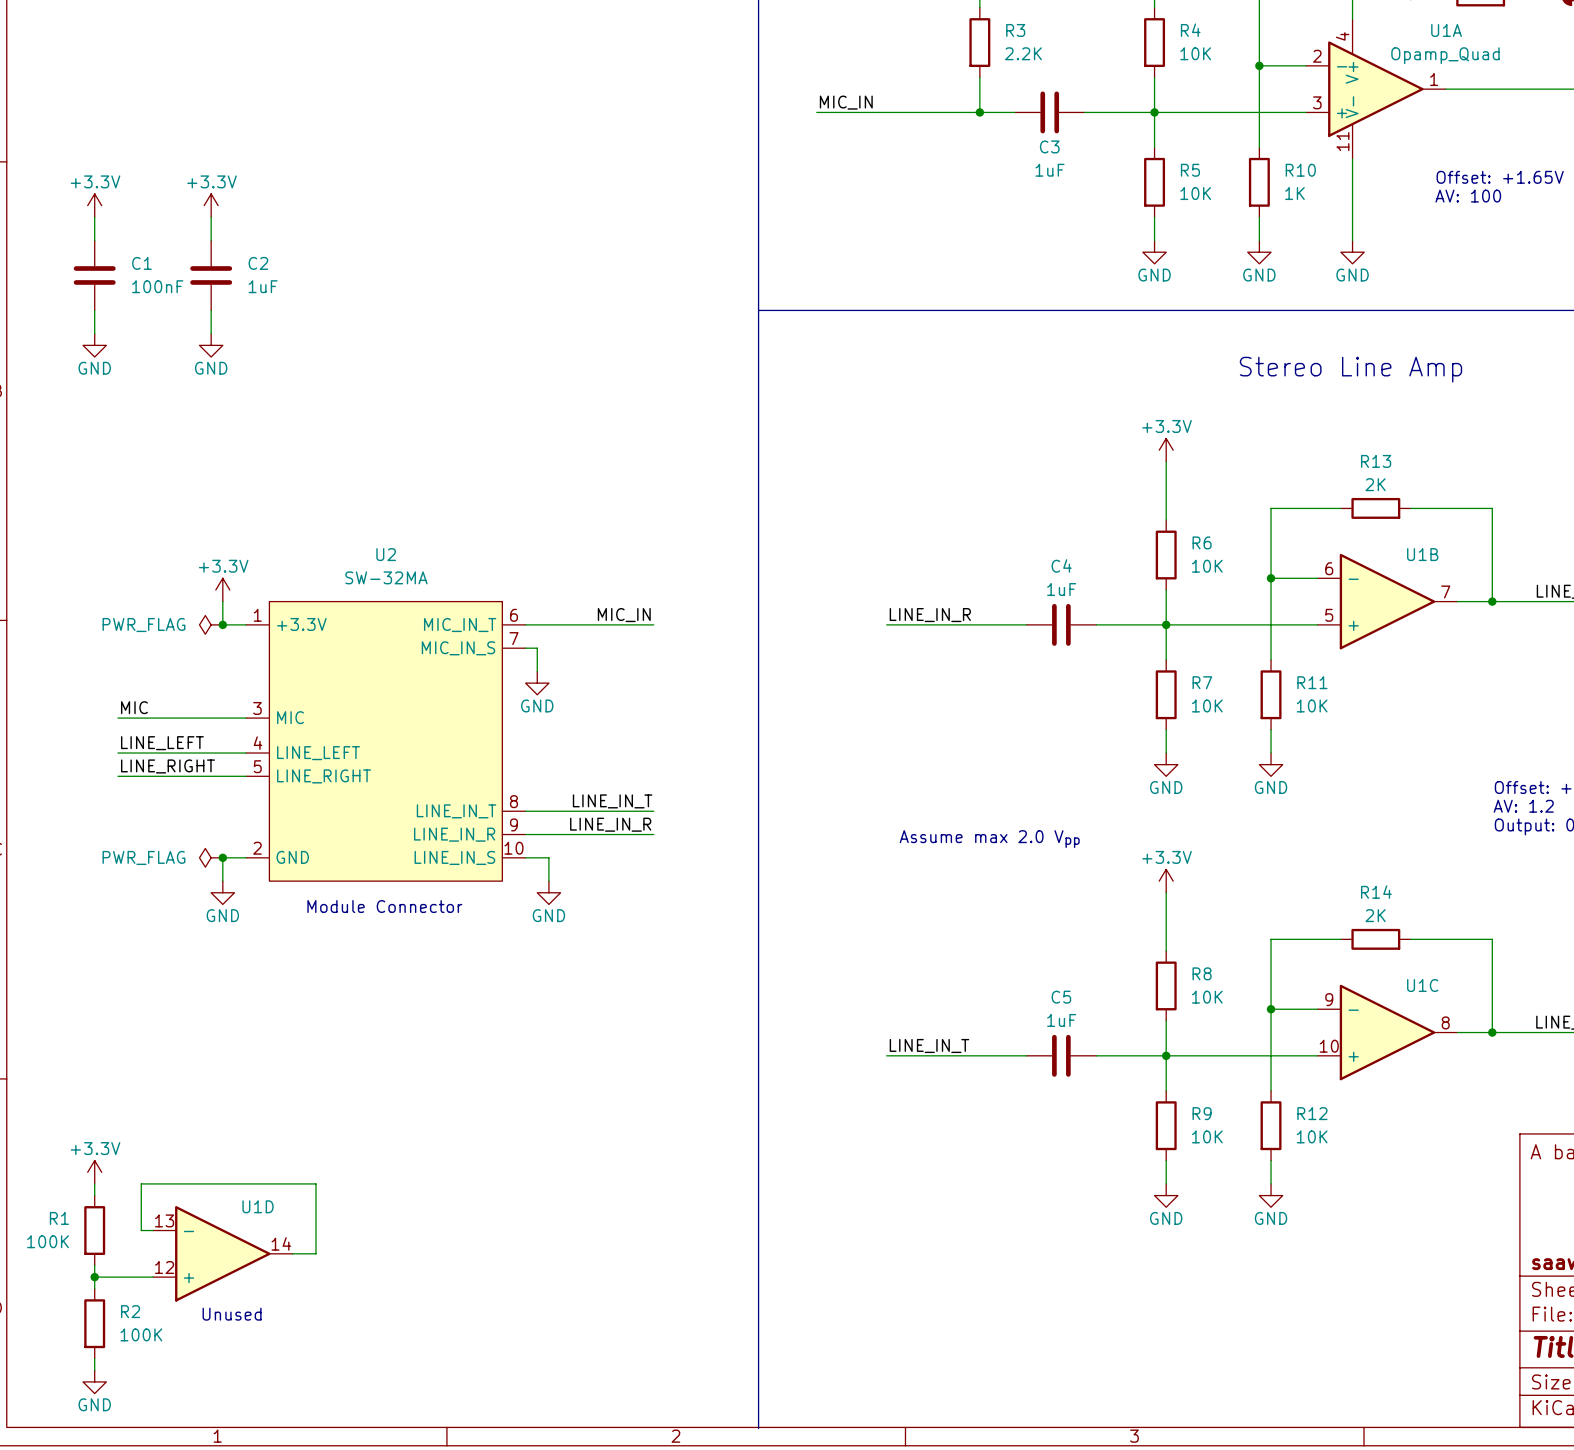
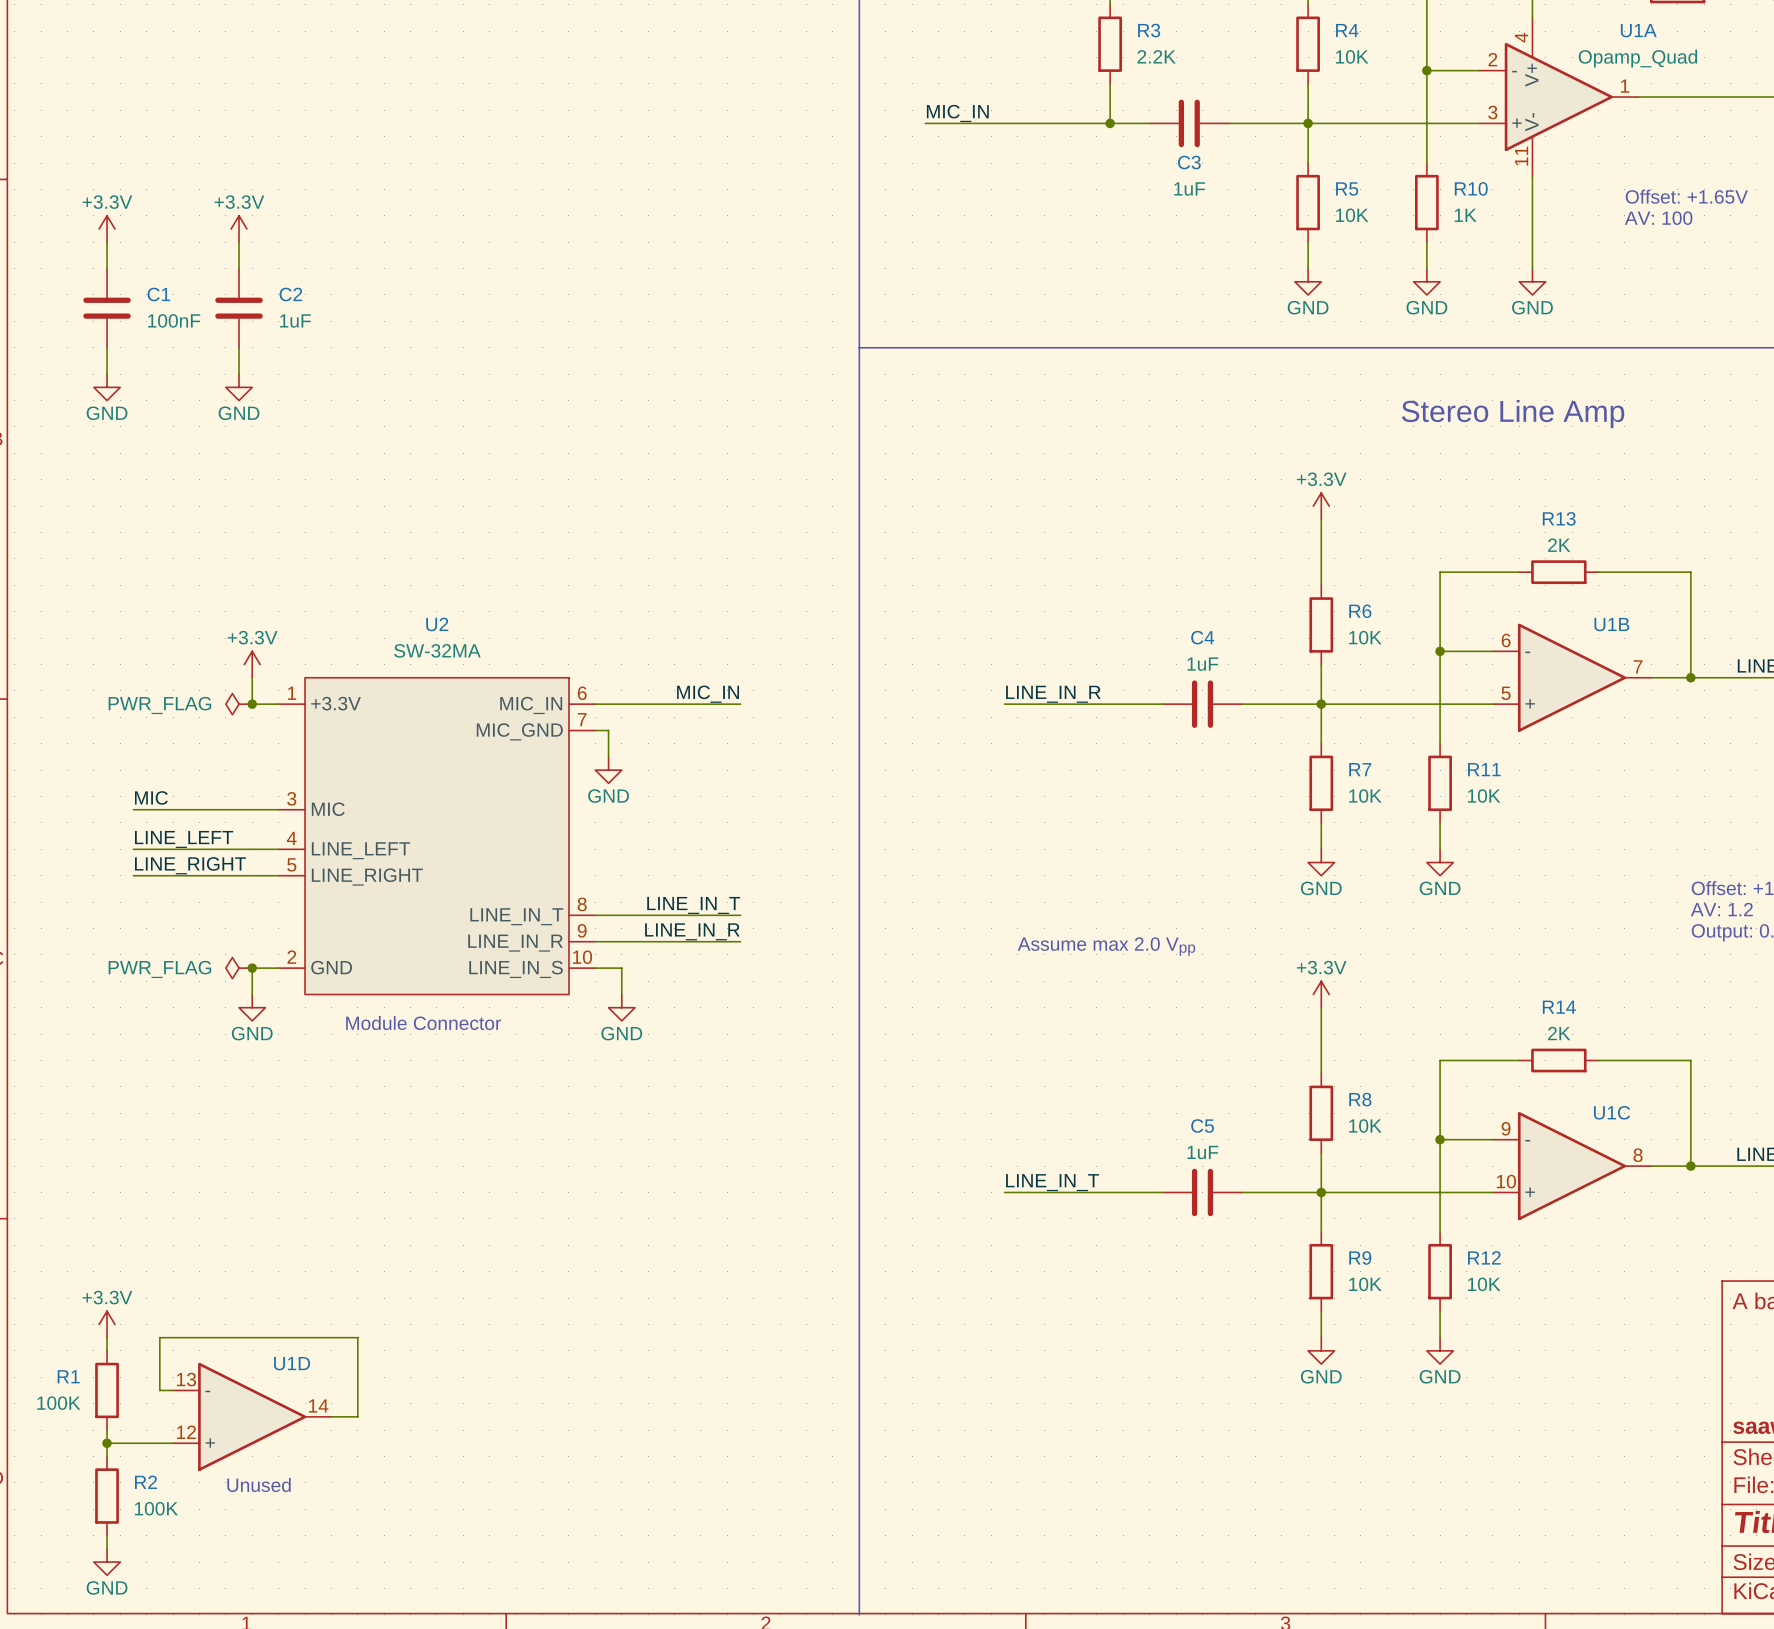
U2 pin name: MIC_IN_T (460, 625) -> MIC_IN (531, 705)
U2 pin name: MIC_IN_S (458, 648) -> MIC_GND (519, 731)

